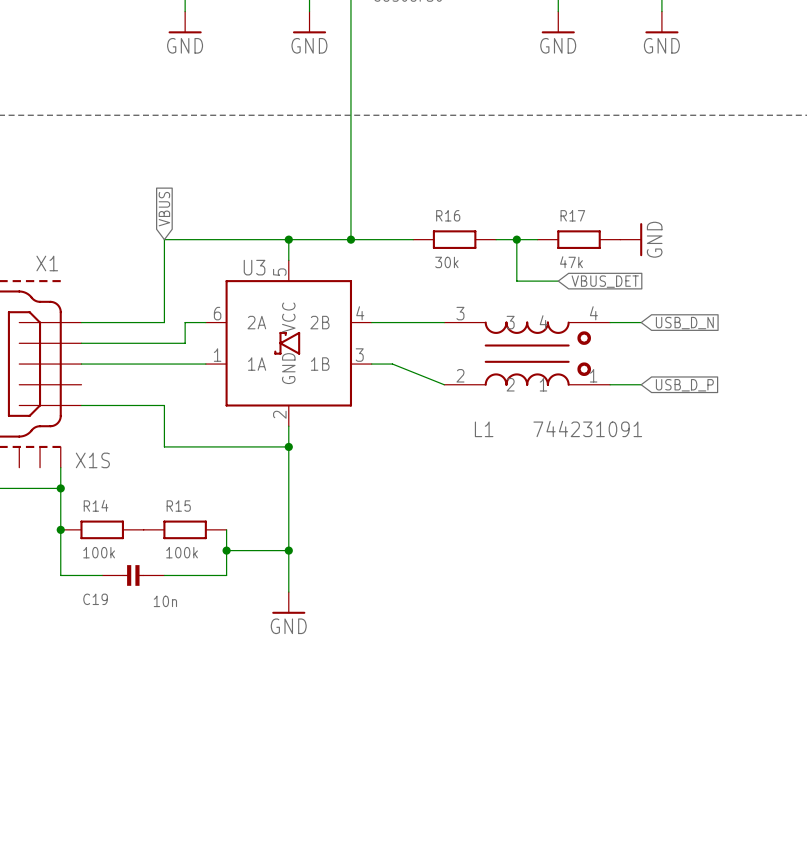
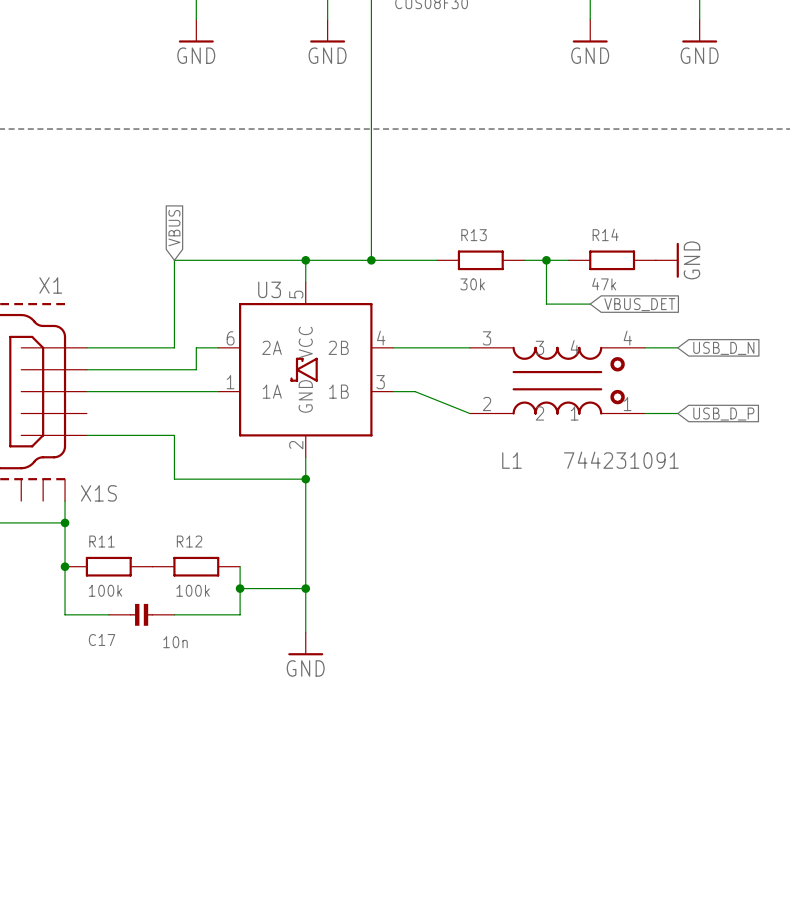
R16 name: R16 (448, 215) -> R13 (474, 235)
R17 name: R17 (572, 215) -> R14 (605, 234)
R14 name: R14 (96, 505) -> R11 (102, 541)
R15 name: R15 (178, 506) -> R12 (189, 541)
C19 name: C19 (95, 599) -> C17 (102, 640)

